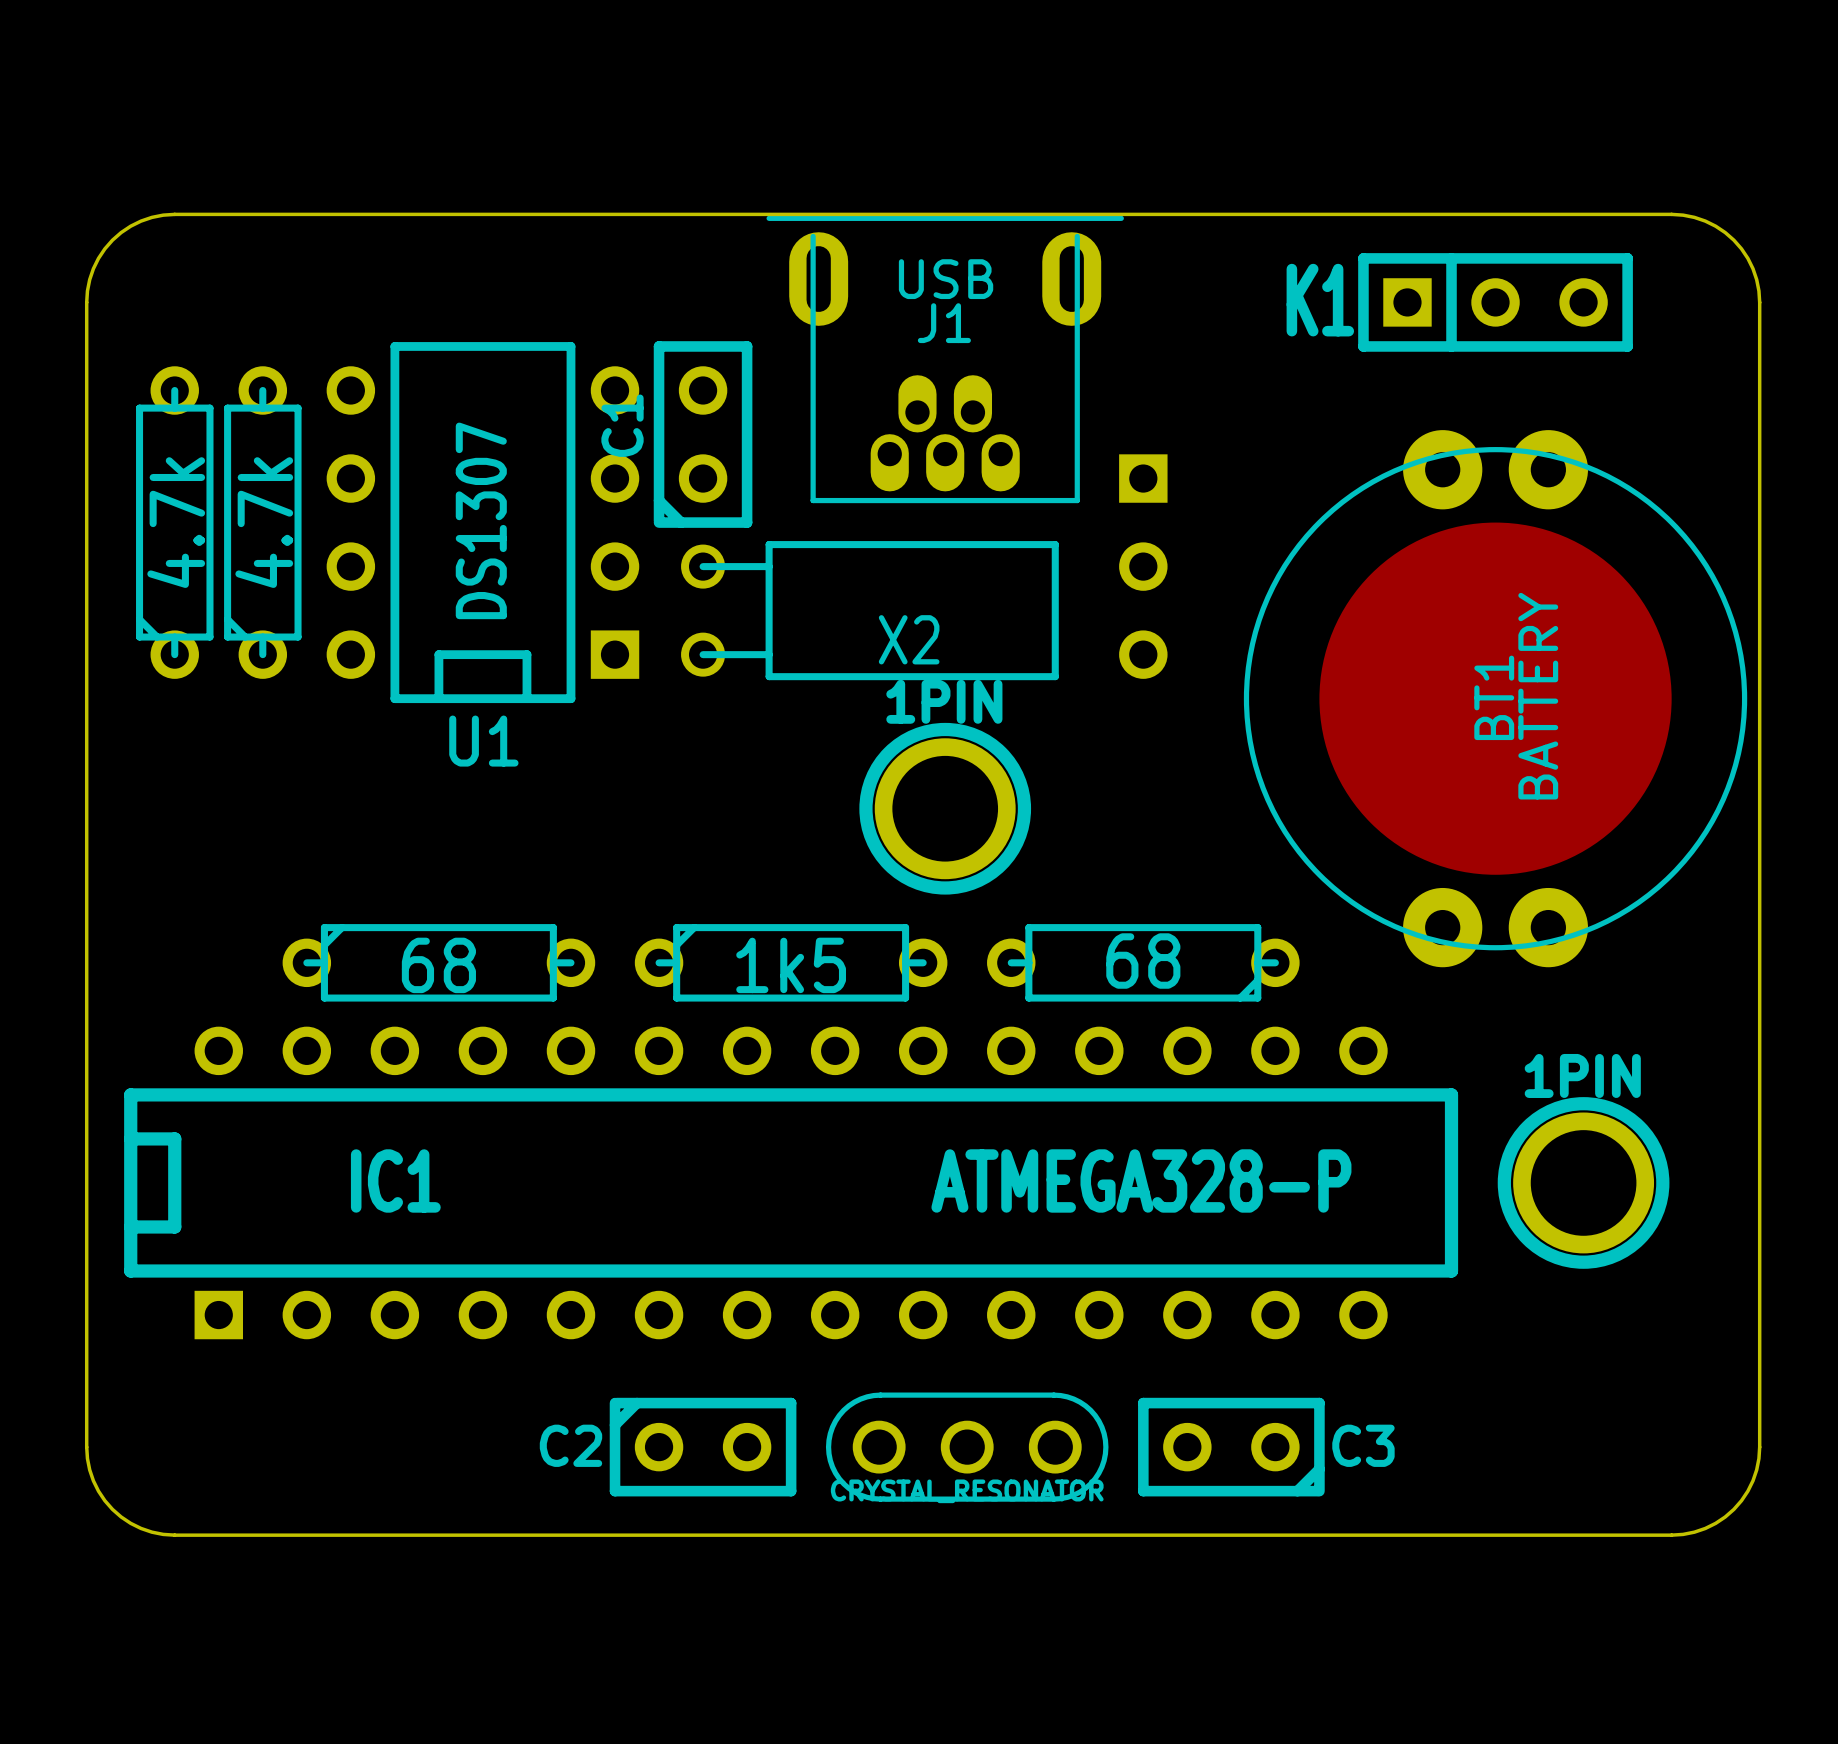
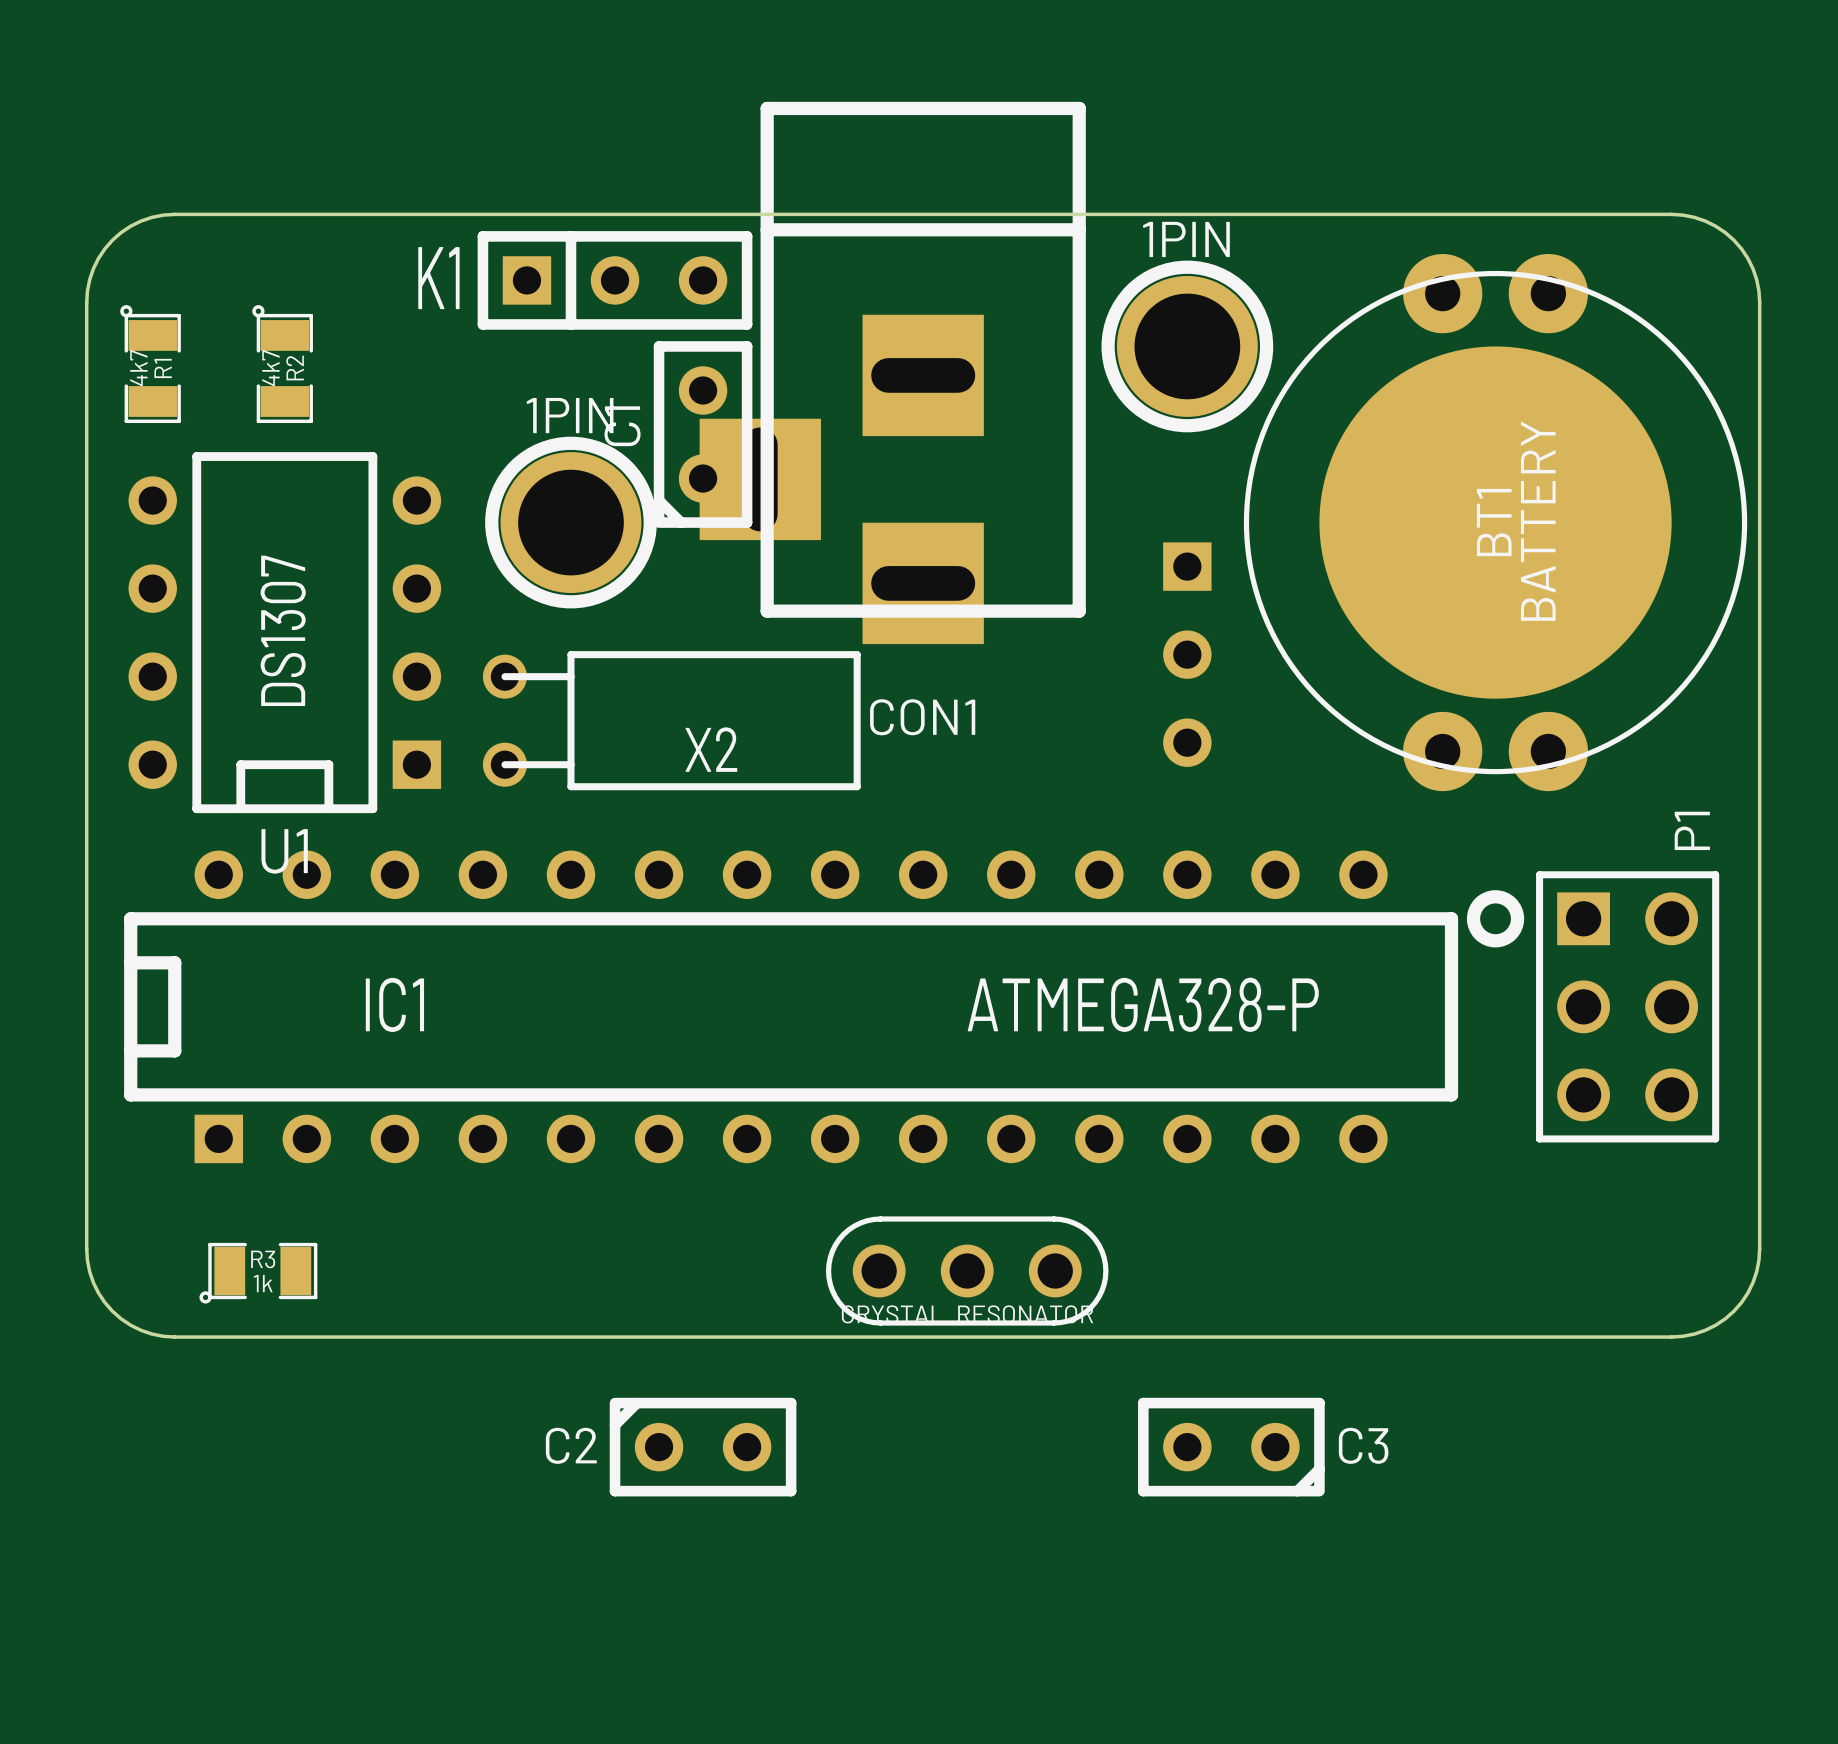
K1 position: (1495, 302) -> (615, 280)
1PIN: none -> (1187, 346)
J1: USB (945, 359) -> none
R1: none -> 4k7 (150, 364)
R2: none -> 4k7 (282, 364)
CON1: none -> (892, 372)
part: 4.7k (174, 522) -> none
part: 4.7k (262, 522) -> none
U1 position: (482, 522) -> (284, 632)
1PIN: none -> (570, 522)
part position: (1143, 566) -> (1187, 654)
X2 position: (869, 610) -> (671, 720)
BT1 position: (1495, 698) -> (1495, 522)
1PIN: (945, 808) -> none
drawing: none -> [1466, 890, 1525, 948]
part: 68 (438, 962) -> none
part: 1k5 (791, 962) -> none
part: 68 (1143, 962) -> none
P1: none -> (1627, 1006)
IC1 position: (791, 1182) -> (791, 1006)
1PIN: (1583, 1182) -> none
board edge: (86, 1248) (86, 1447) (89, 1469) (98, 1491) (104, 1500) (121, 1516) (141, 1528) (163, 1534) (174, 1535) (1683, 1534) (1694, 1532) (1715, 1523) (1733, 1509) (1747, 1491) (1756, 1469) (1759, 1447) (1759, 1248) -> (86, 1248) (87, 1260) (93, 1282) (104, 1302) (112, 1311) (130, 1325) (141, 1330) (163, 1336) (174, 1337) (1671, 1337) (1694, 1334) (1705, 1330) (1715, 1325) (1733, 1311) (1747, 1293) (1752, 1282) (1756, 1271) (1759, 1248)
R3: none -> 1k (258, 1273)
part position: (967, 1447) -> (967, 1271)

